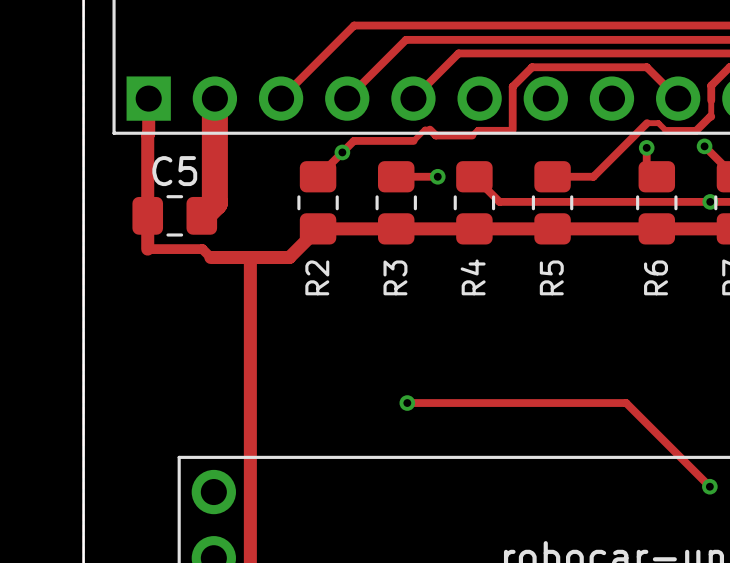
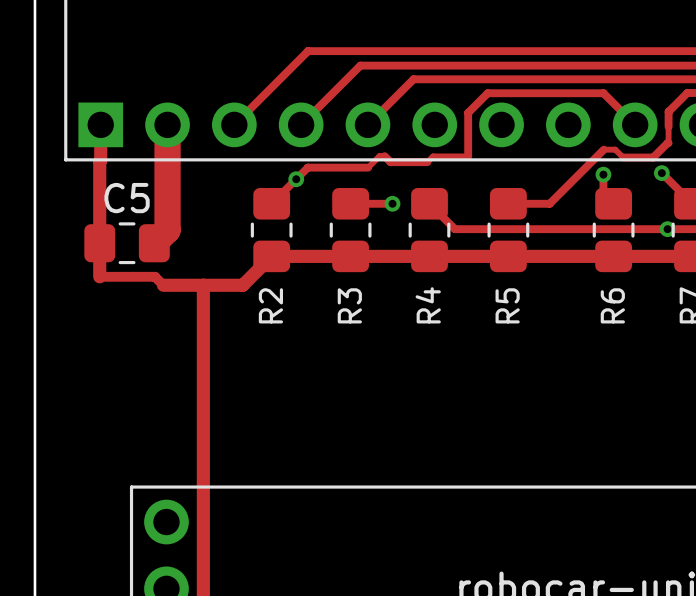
track: (407, 403) (626, 403) (709, 486) -> none
via: (407, 403) -> none
via: (709, 486) -> none

